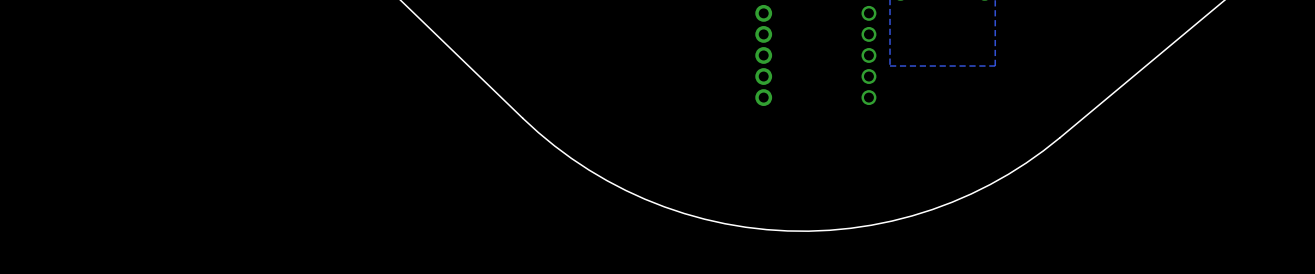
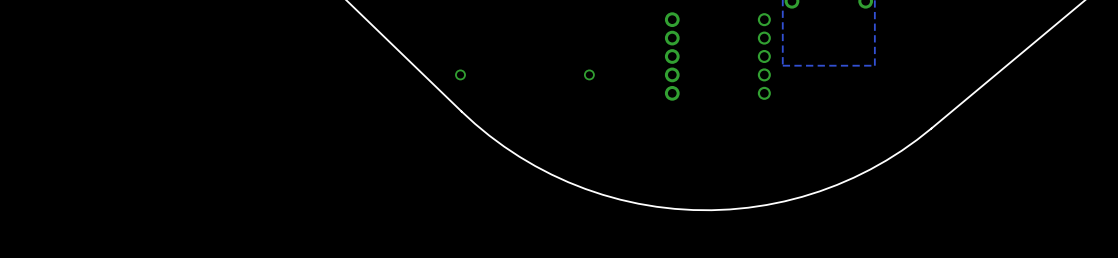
via: none -> (460, 74)
via: none -> (589, 74)

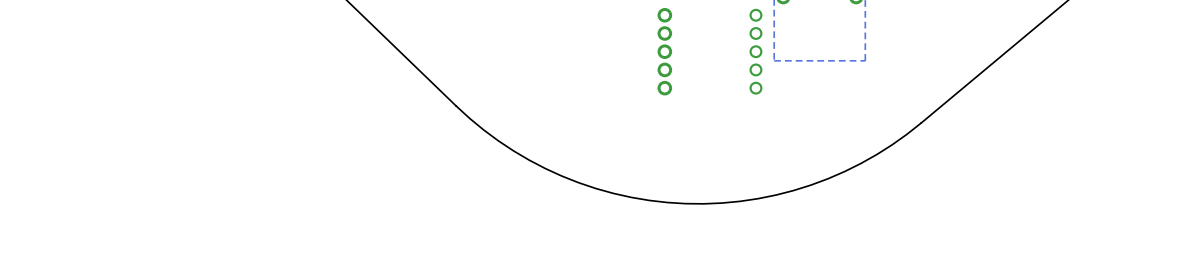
via: (460, 74) -> none
via: (589, 74) -> none

